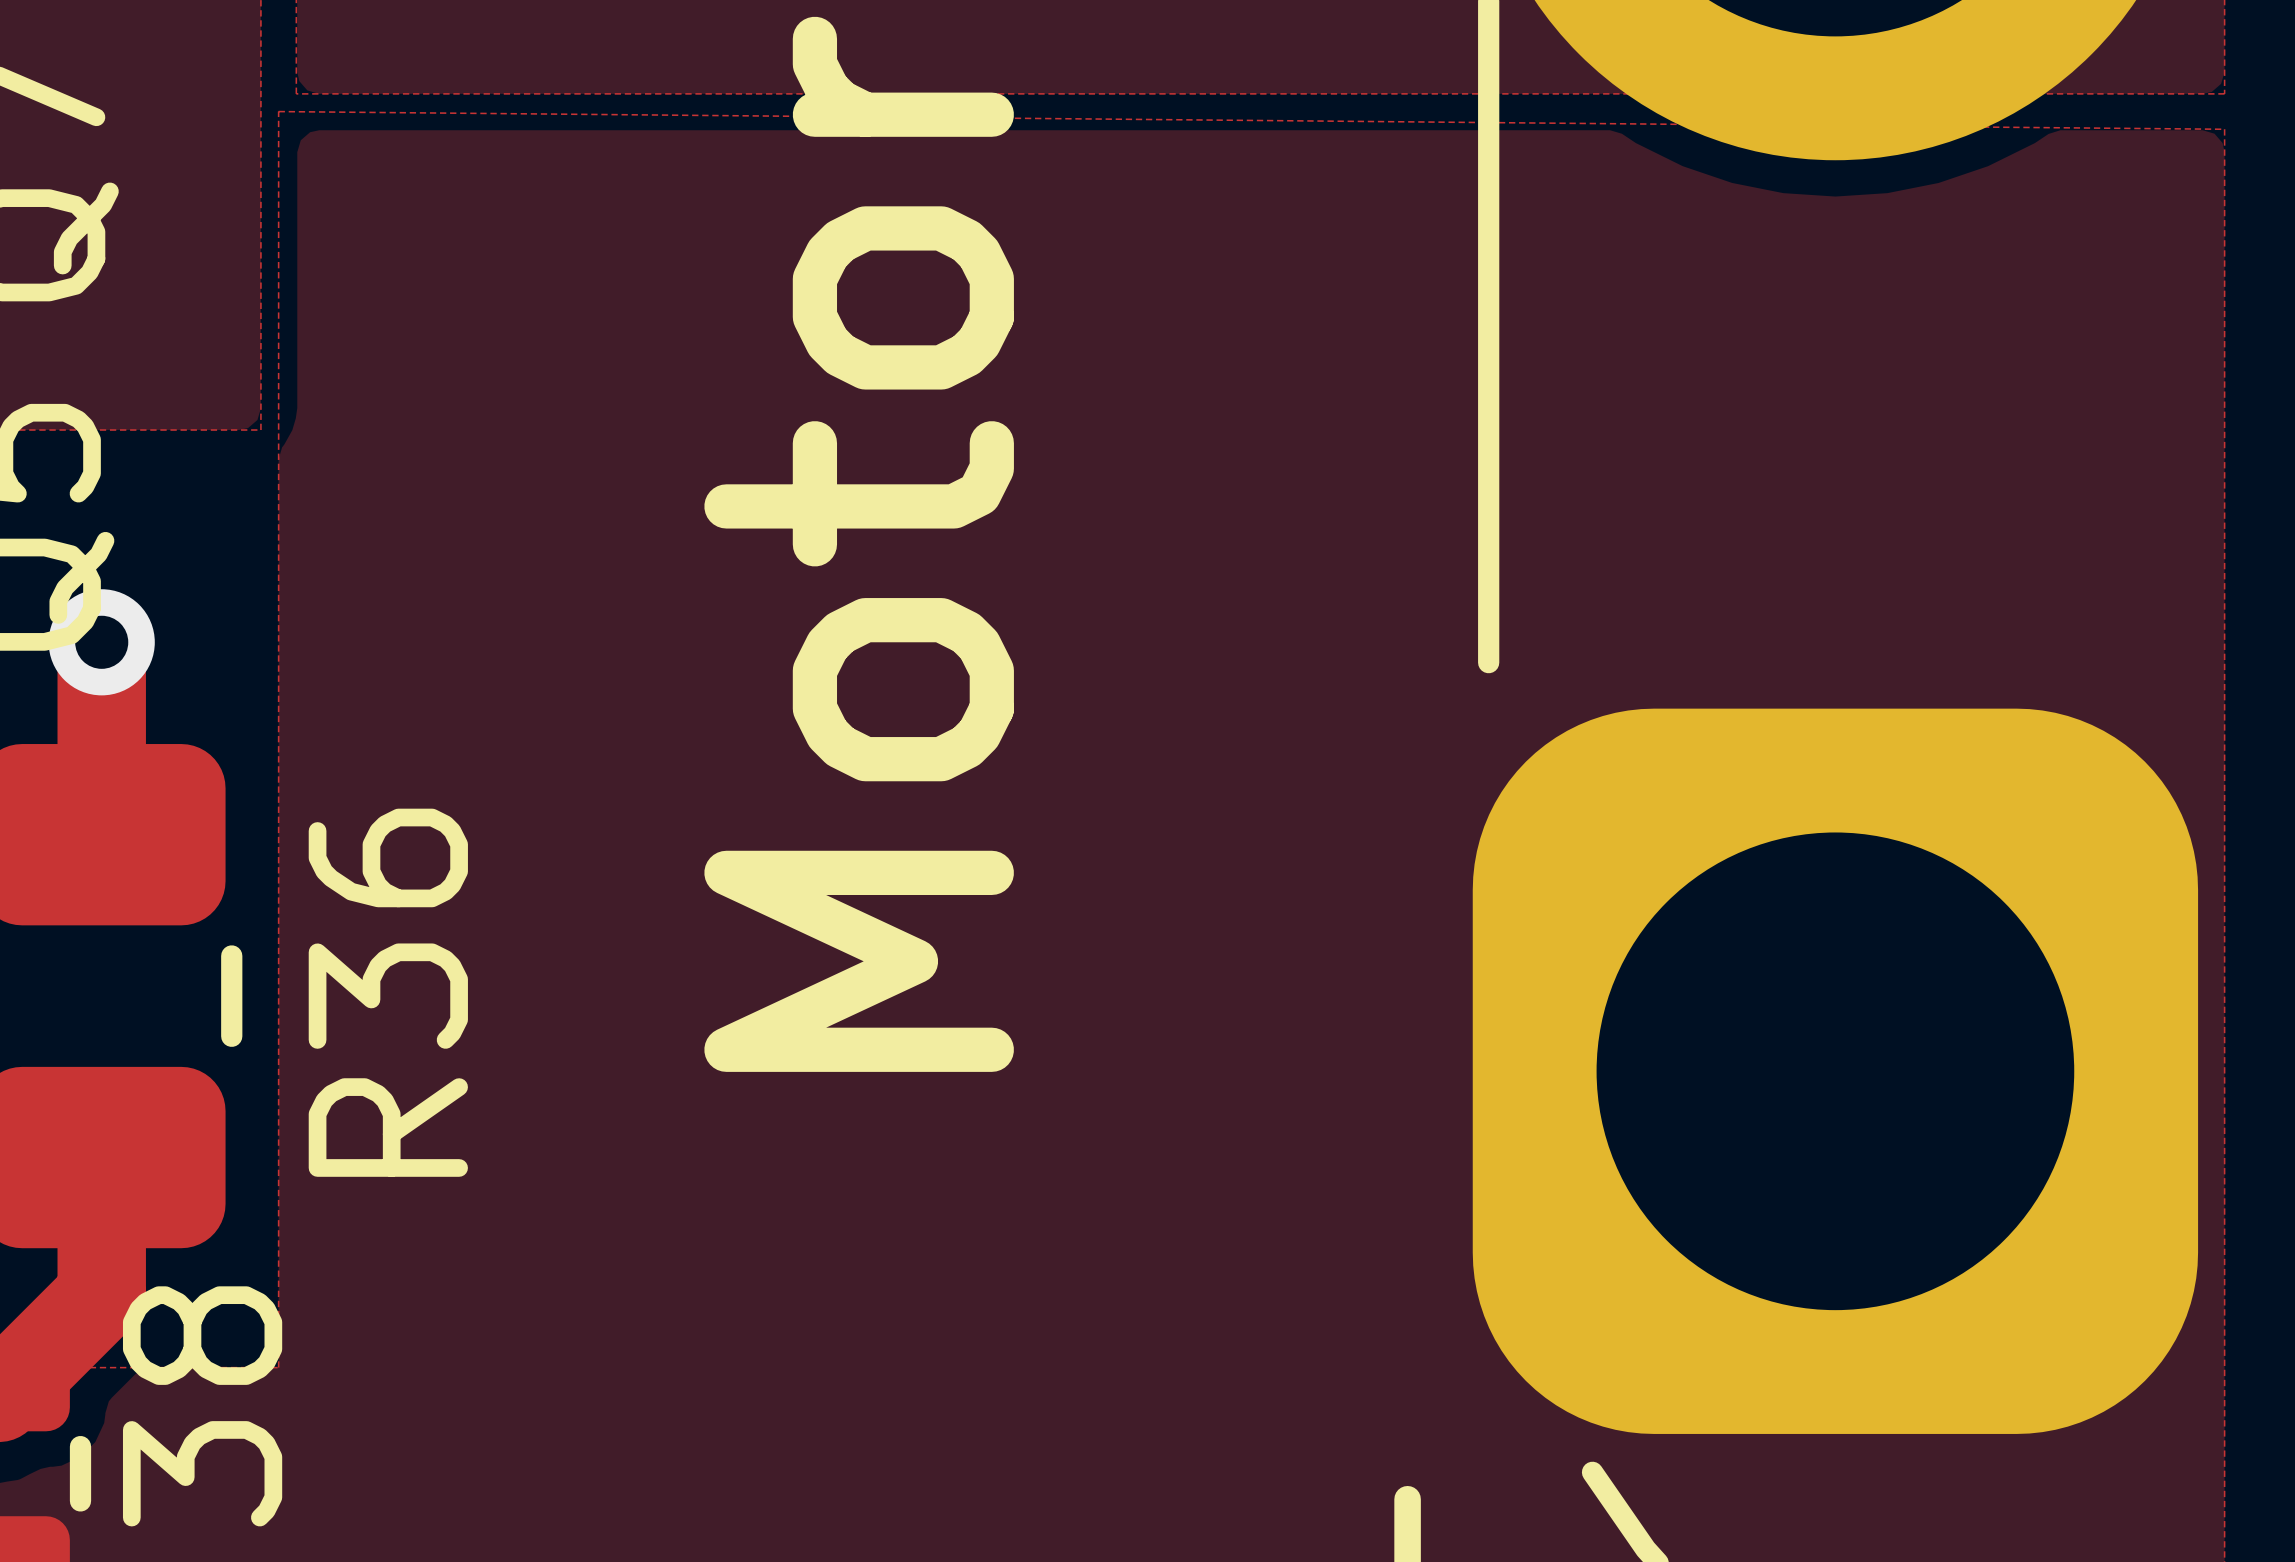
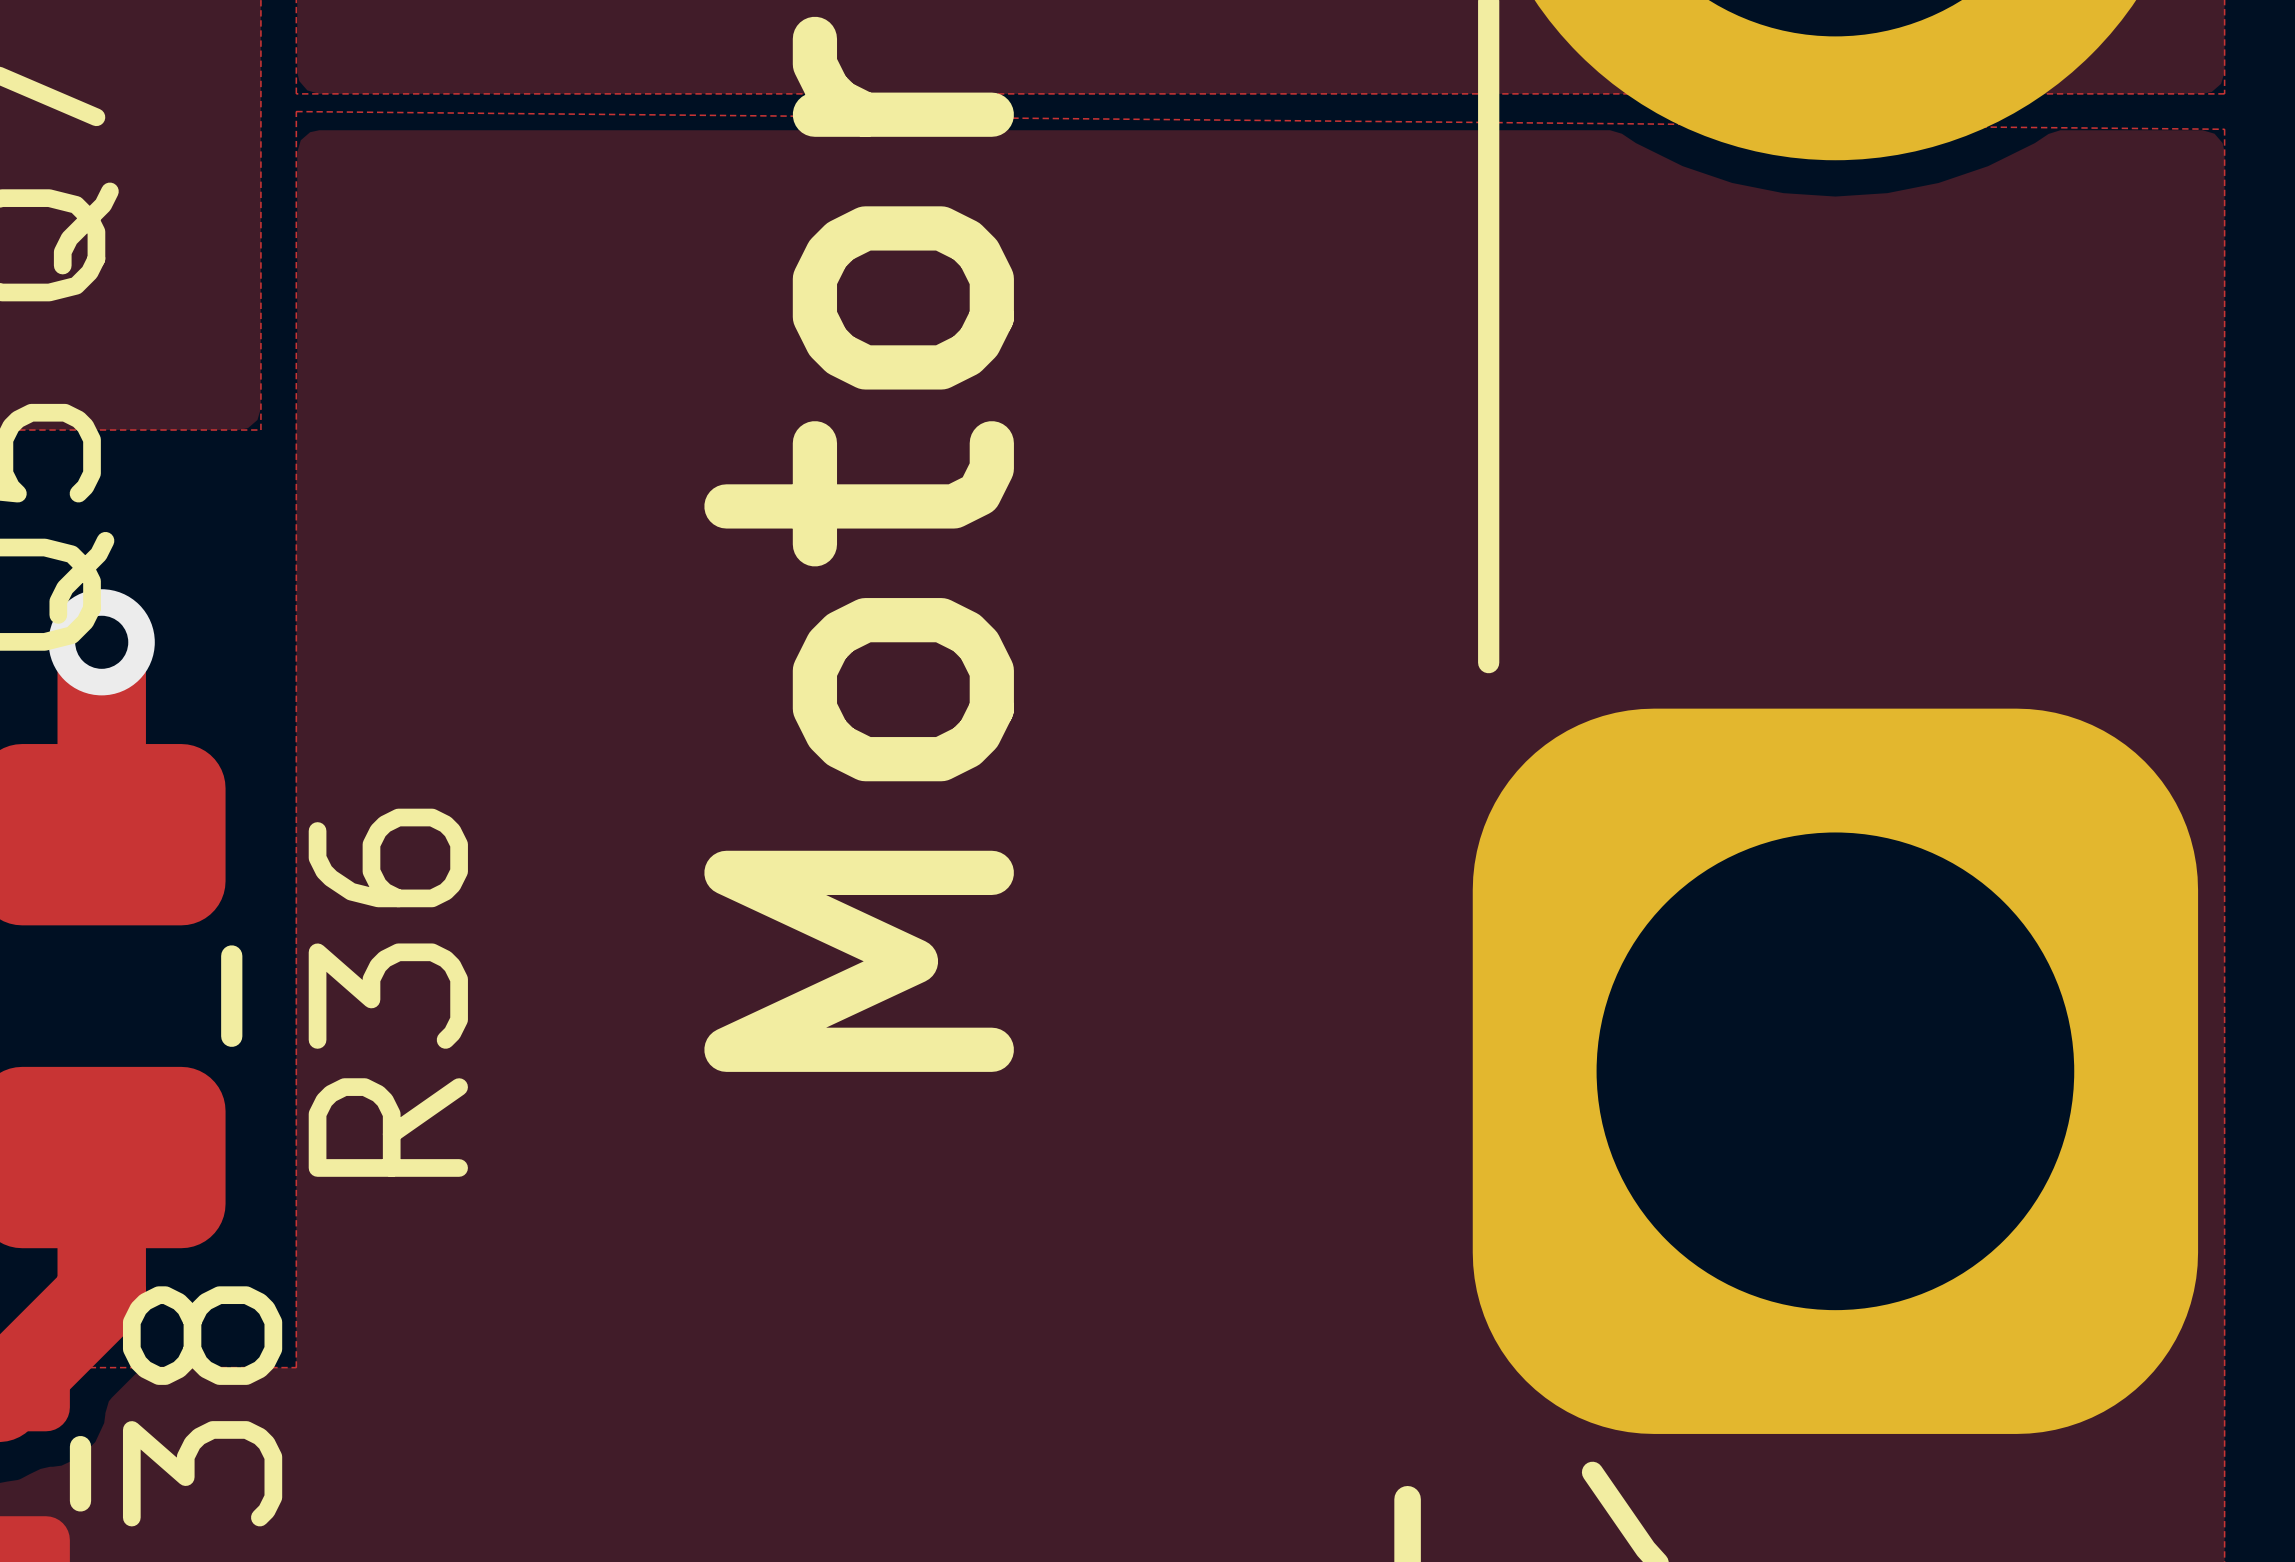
zone outline: (2224, 129) (278, 111) (278, 1367) -> (2224, 129) (296, 111) (296, 1367) (278, 1367)

